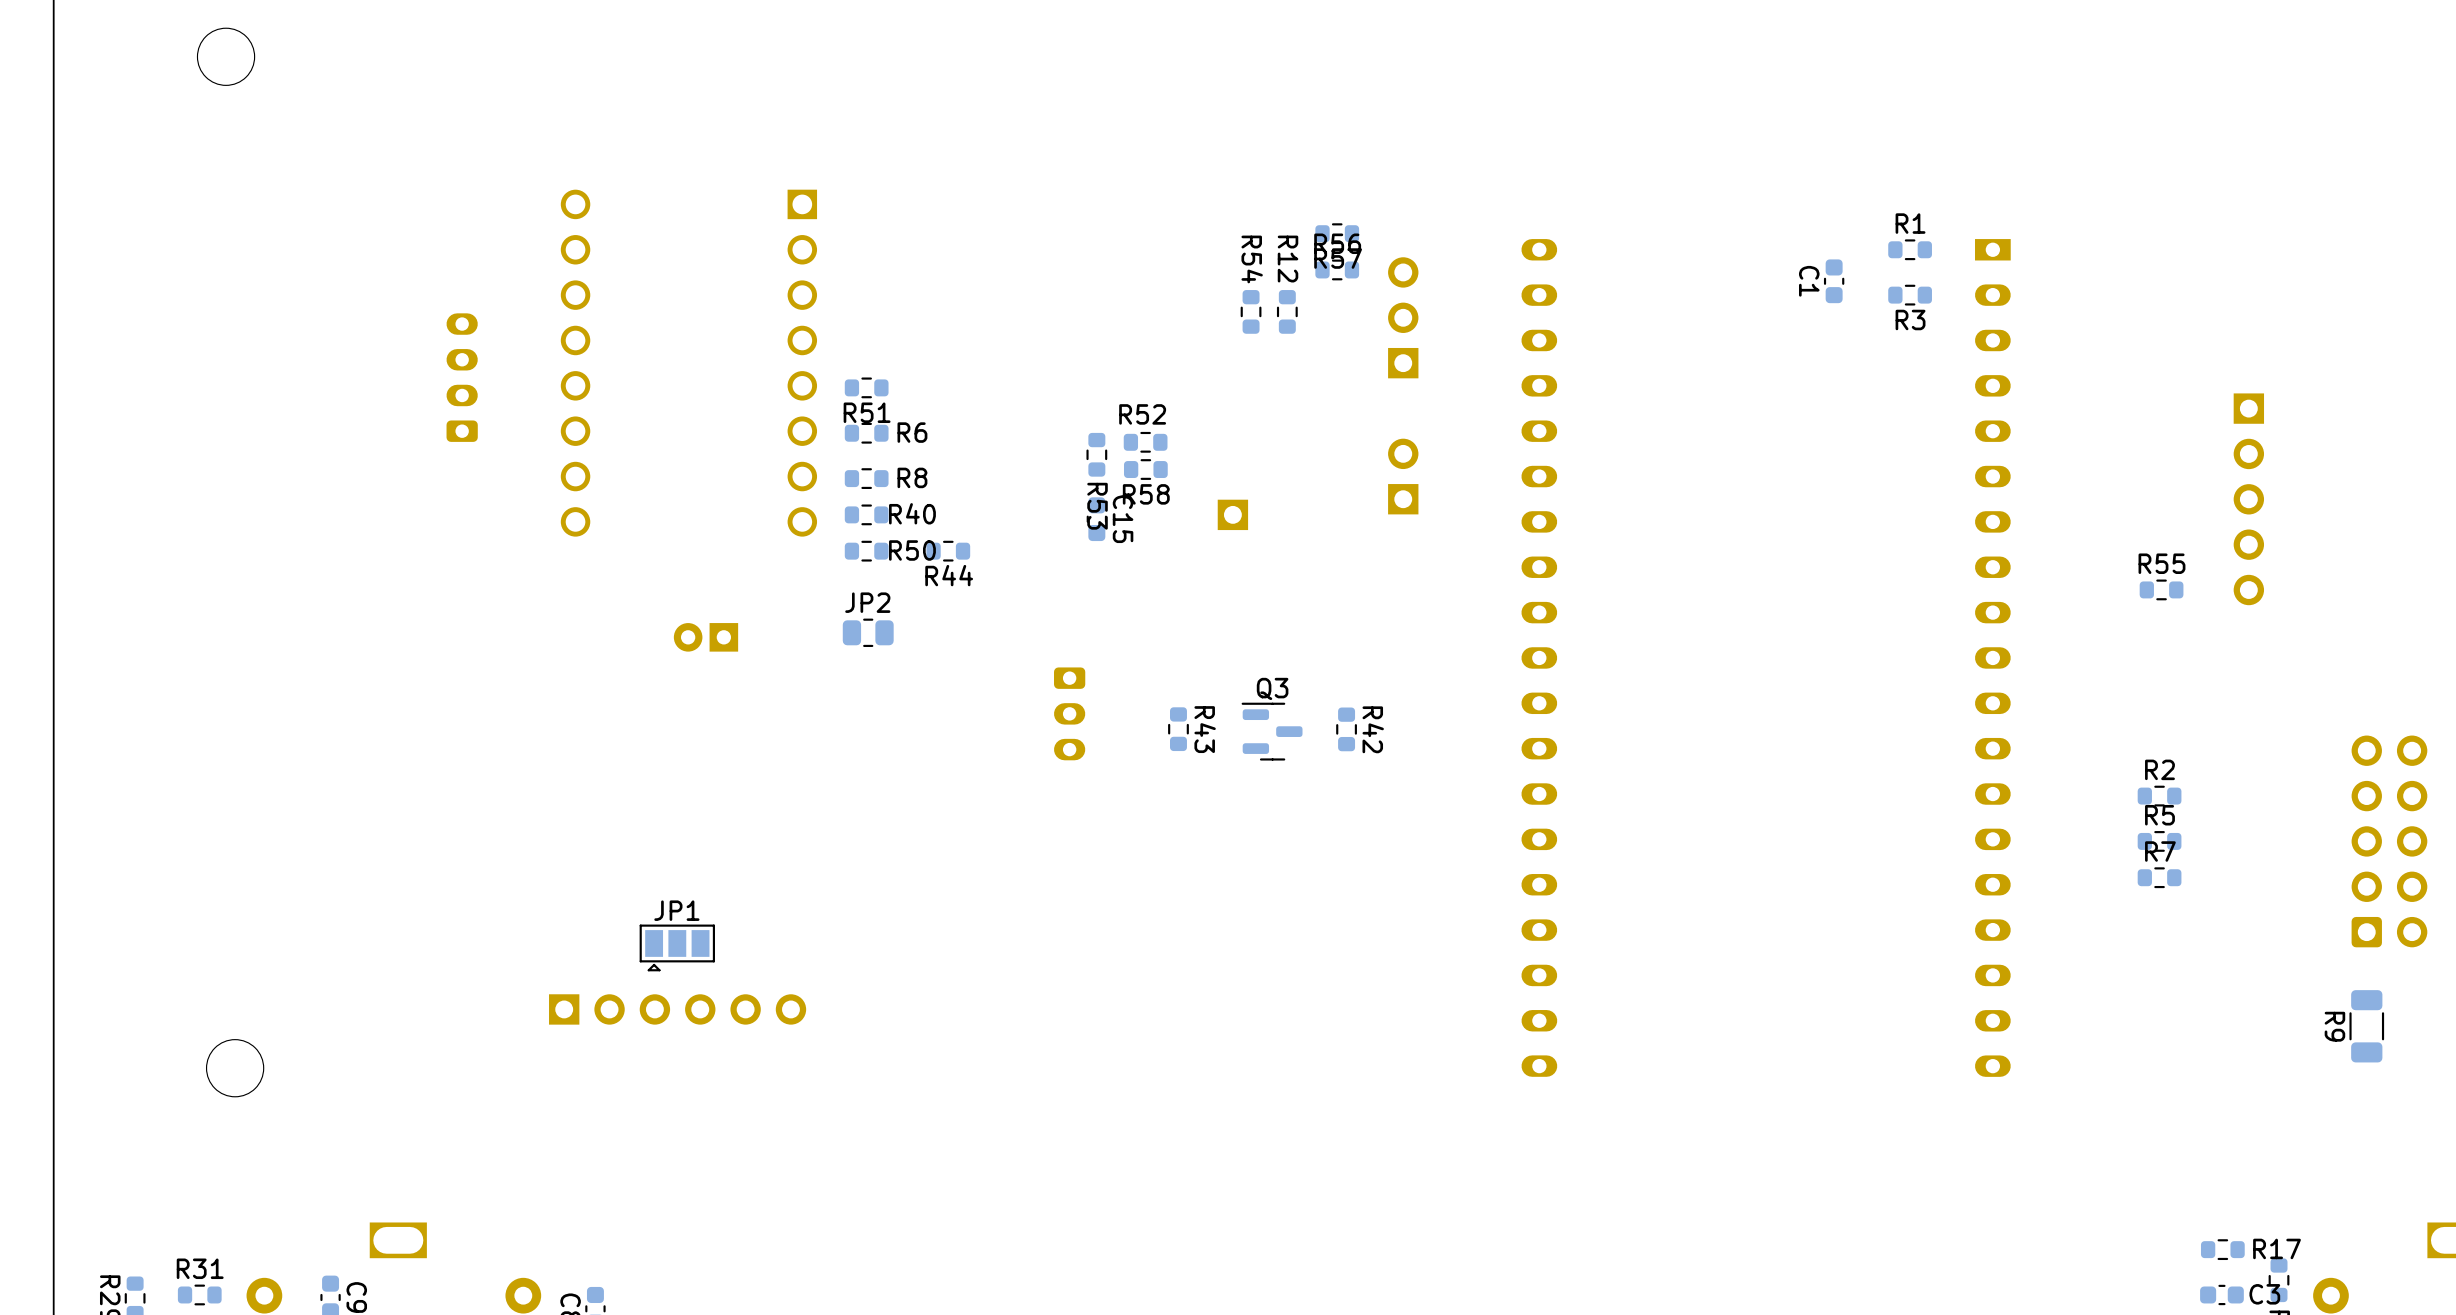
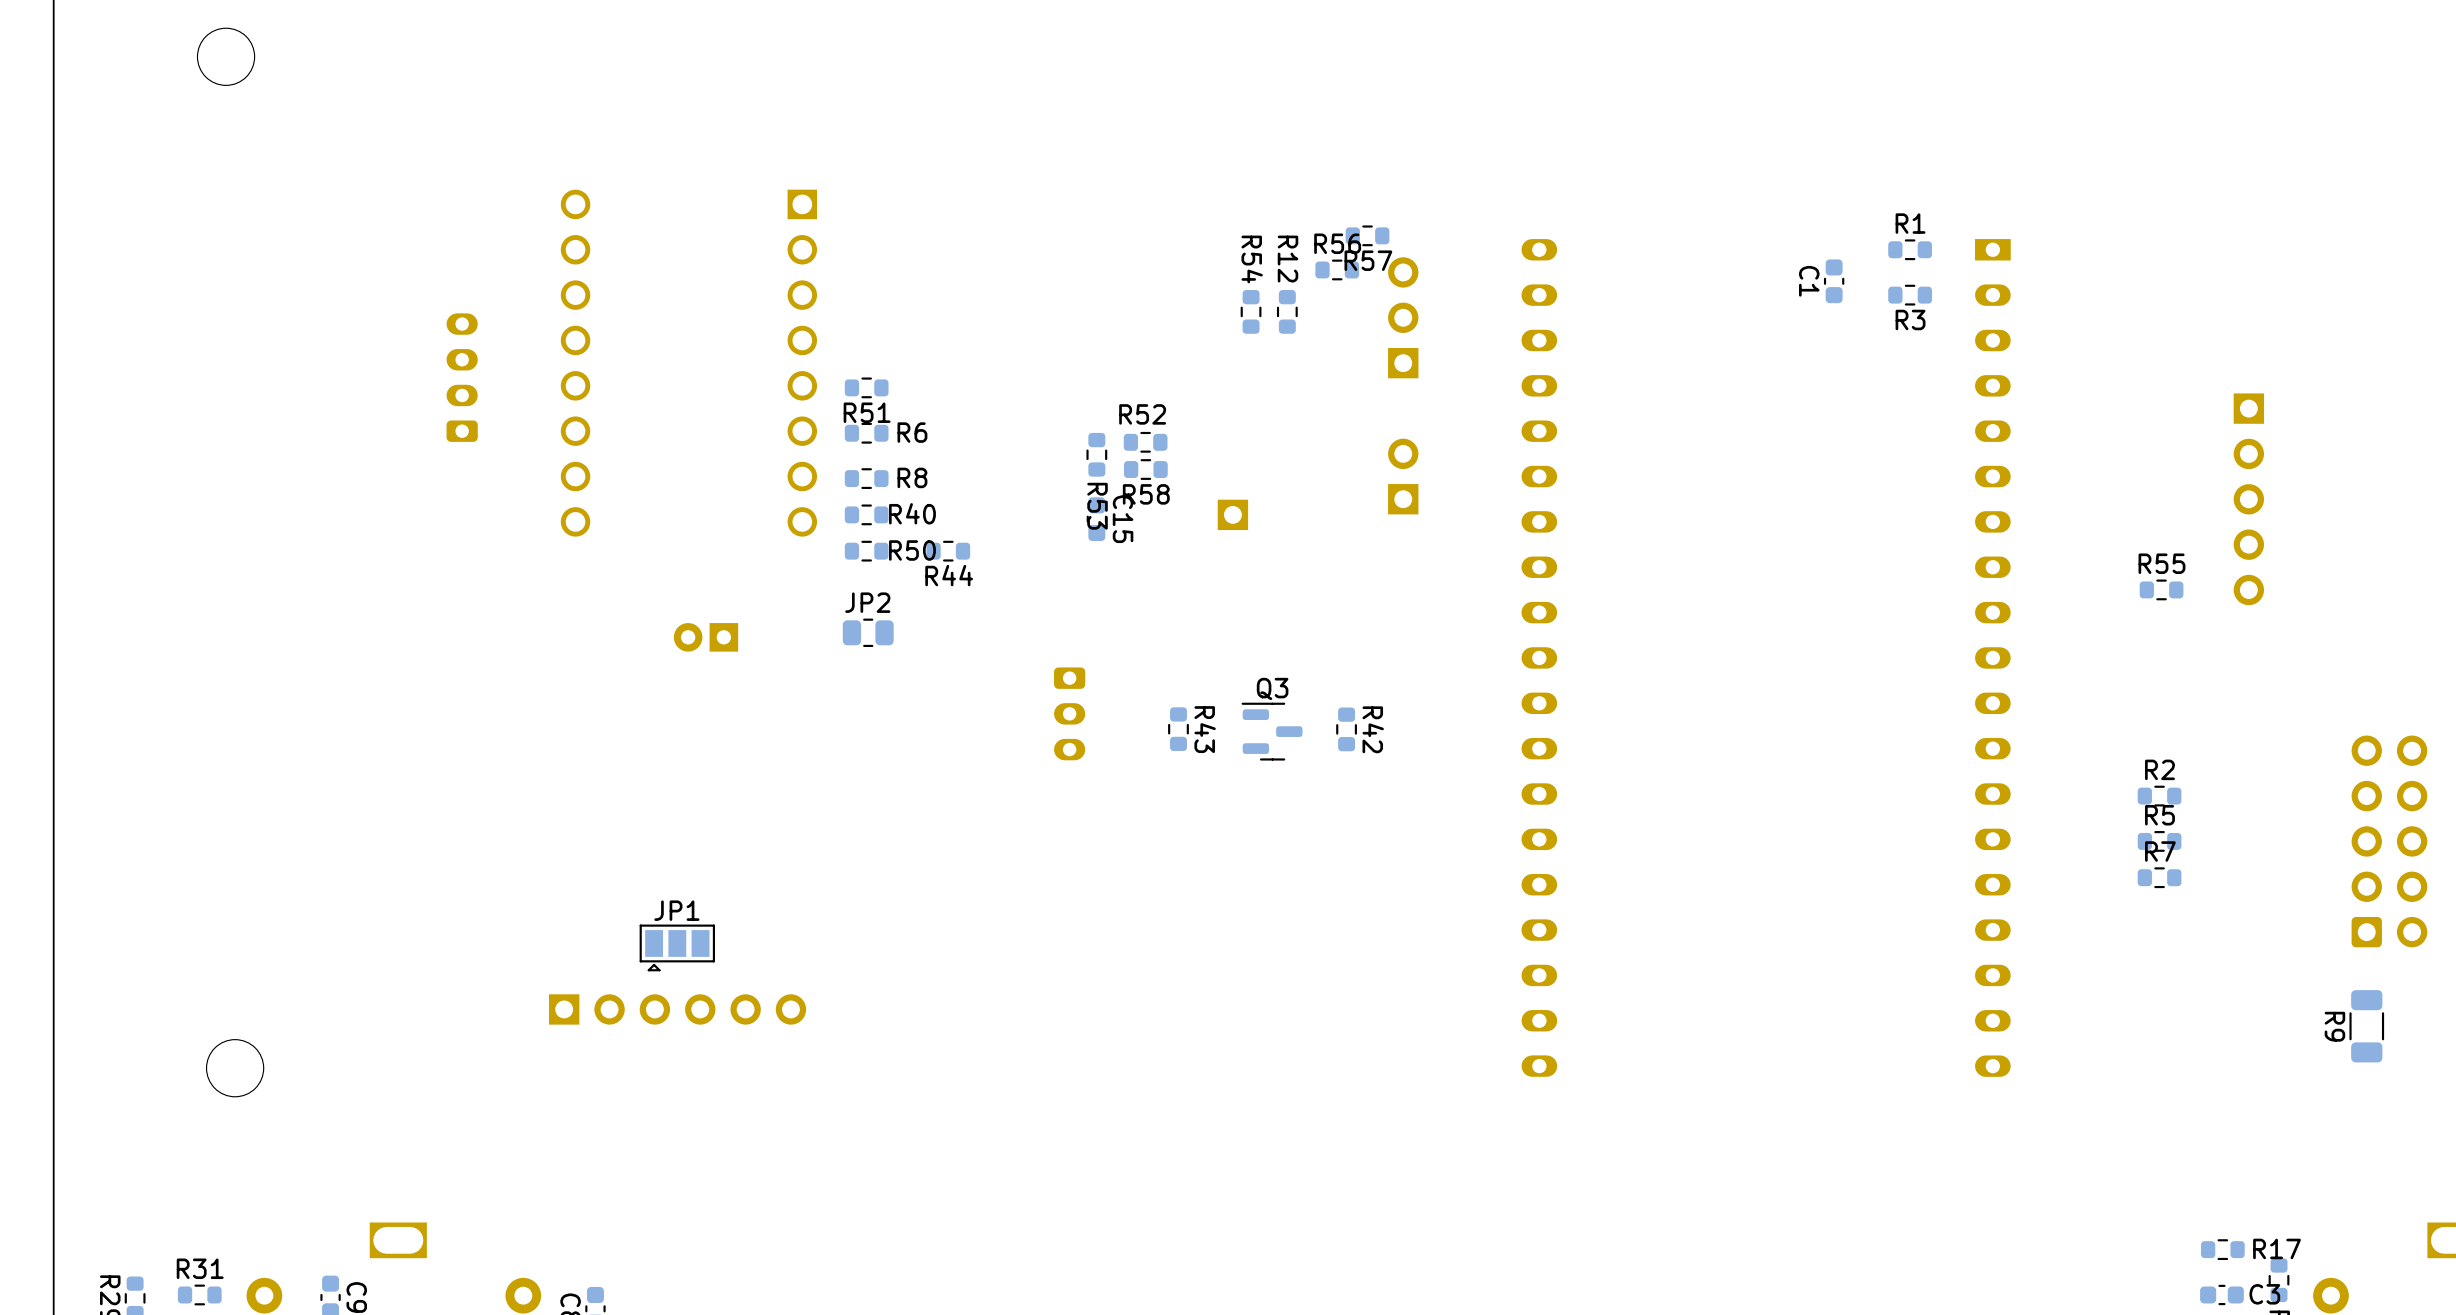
R57 position: (1337, 233) -> (1367, 235)

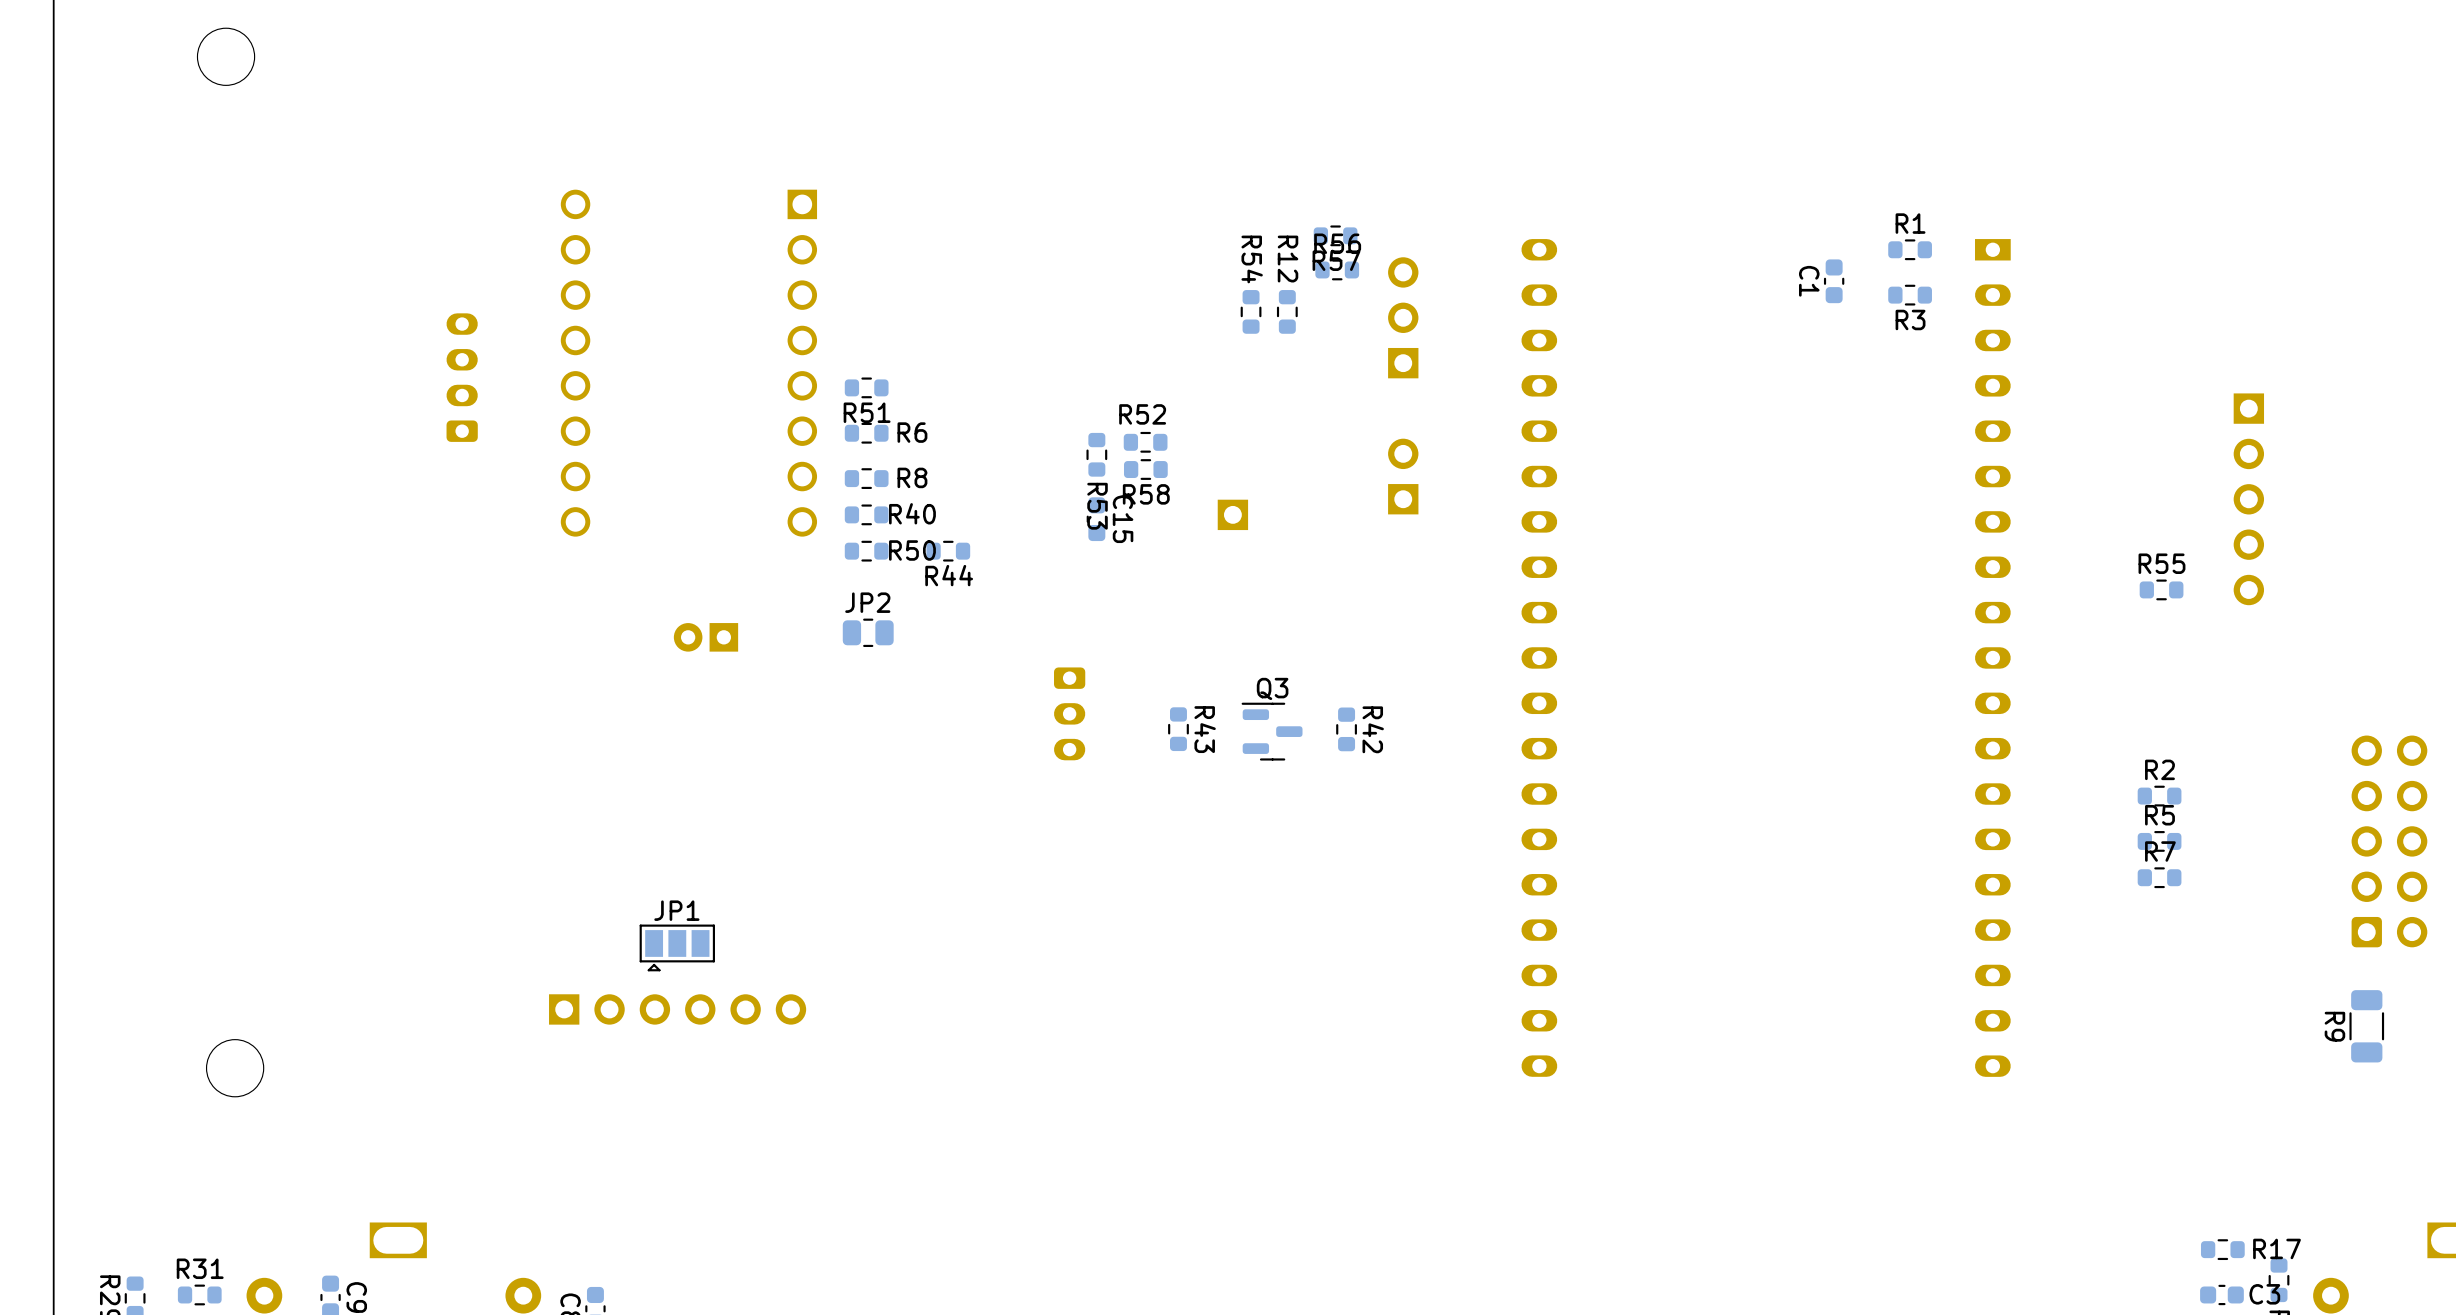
R57 position: (1367, 235) -> (1335, 235)

